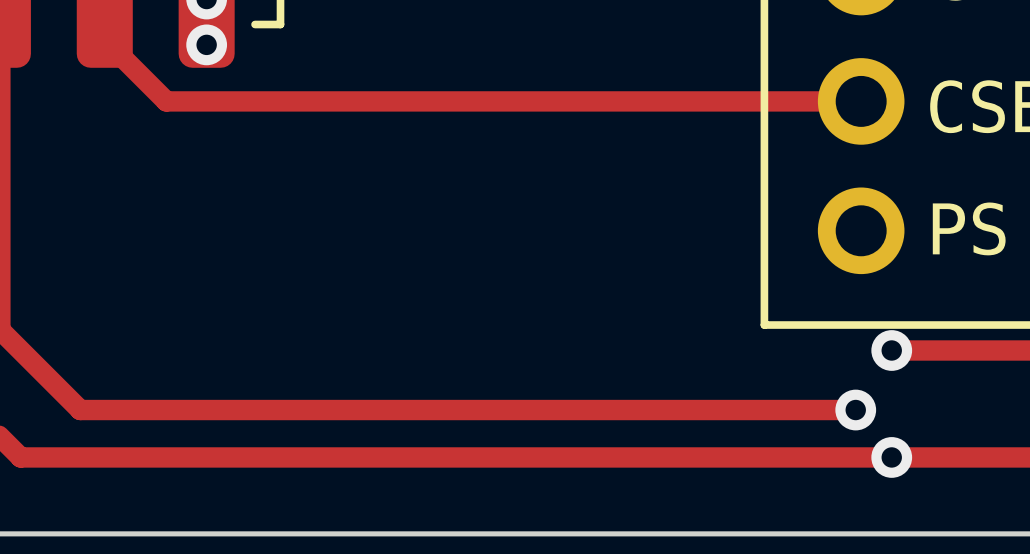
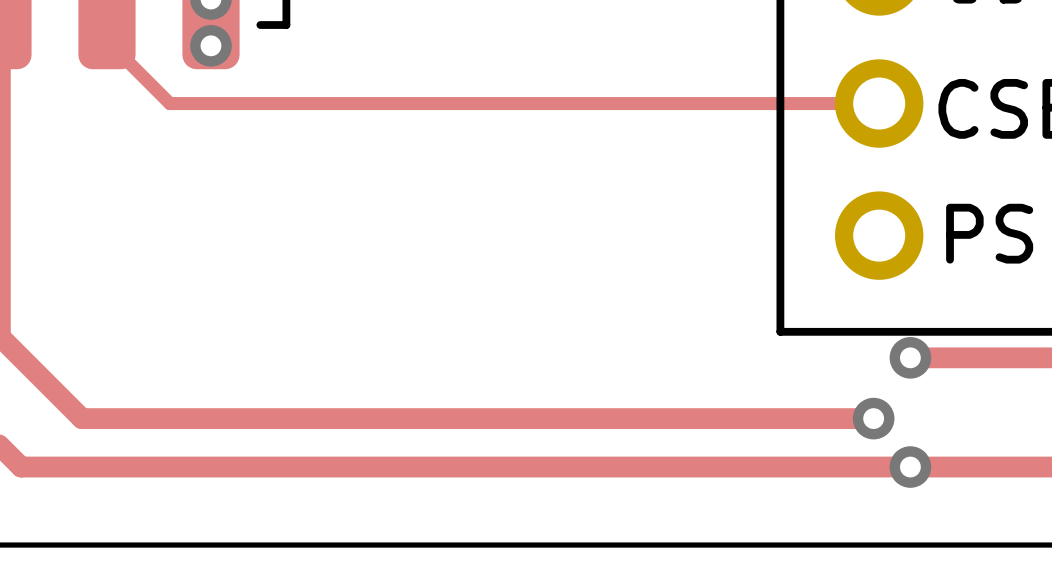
track width: thick (104, 39) (166, 101) (861, 101) -> thin (106, 40) (169, 103) (879, 103)

